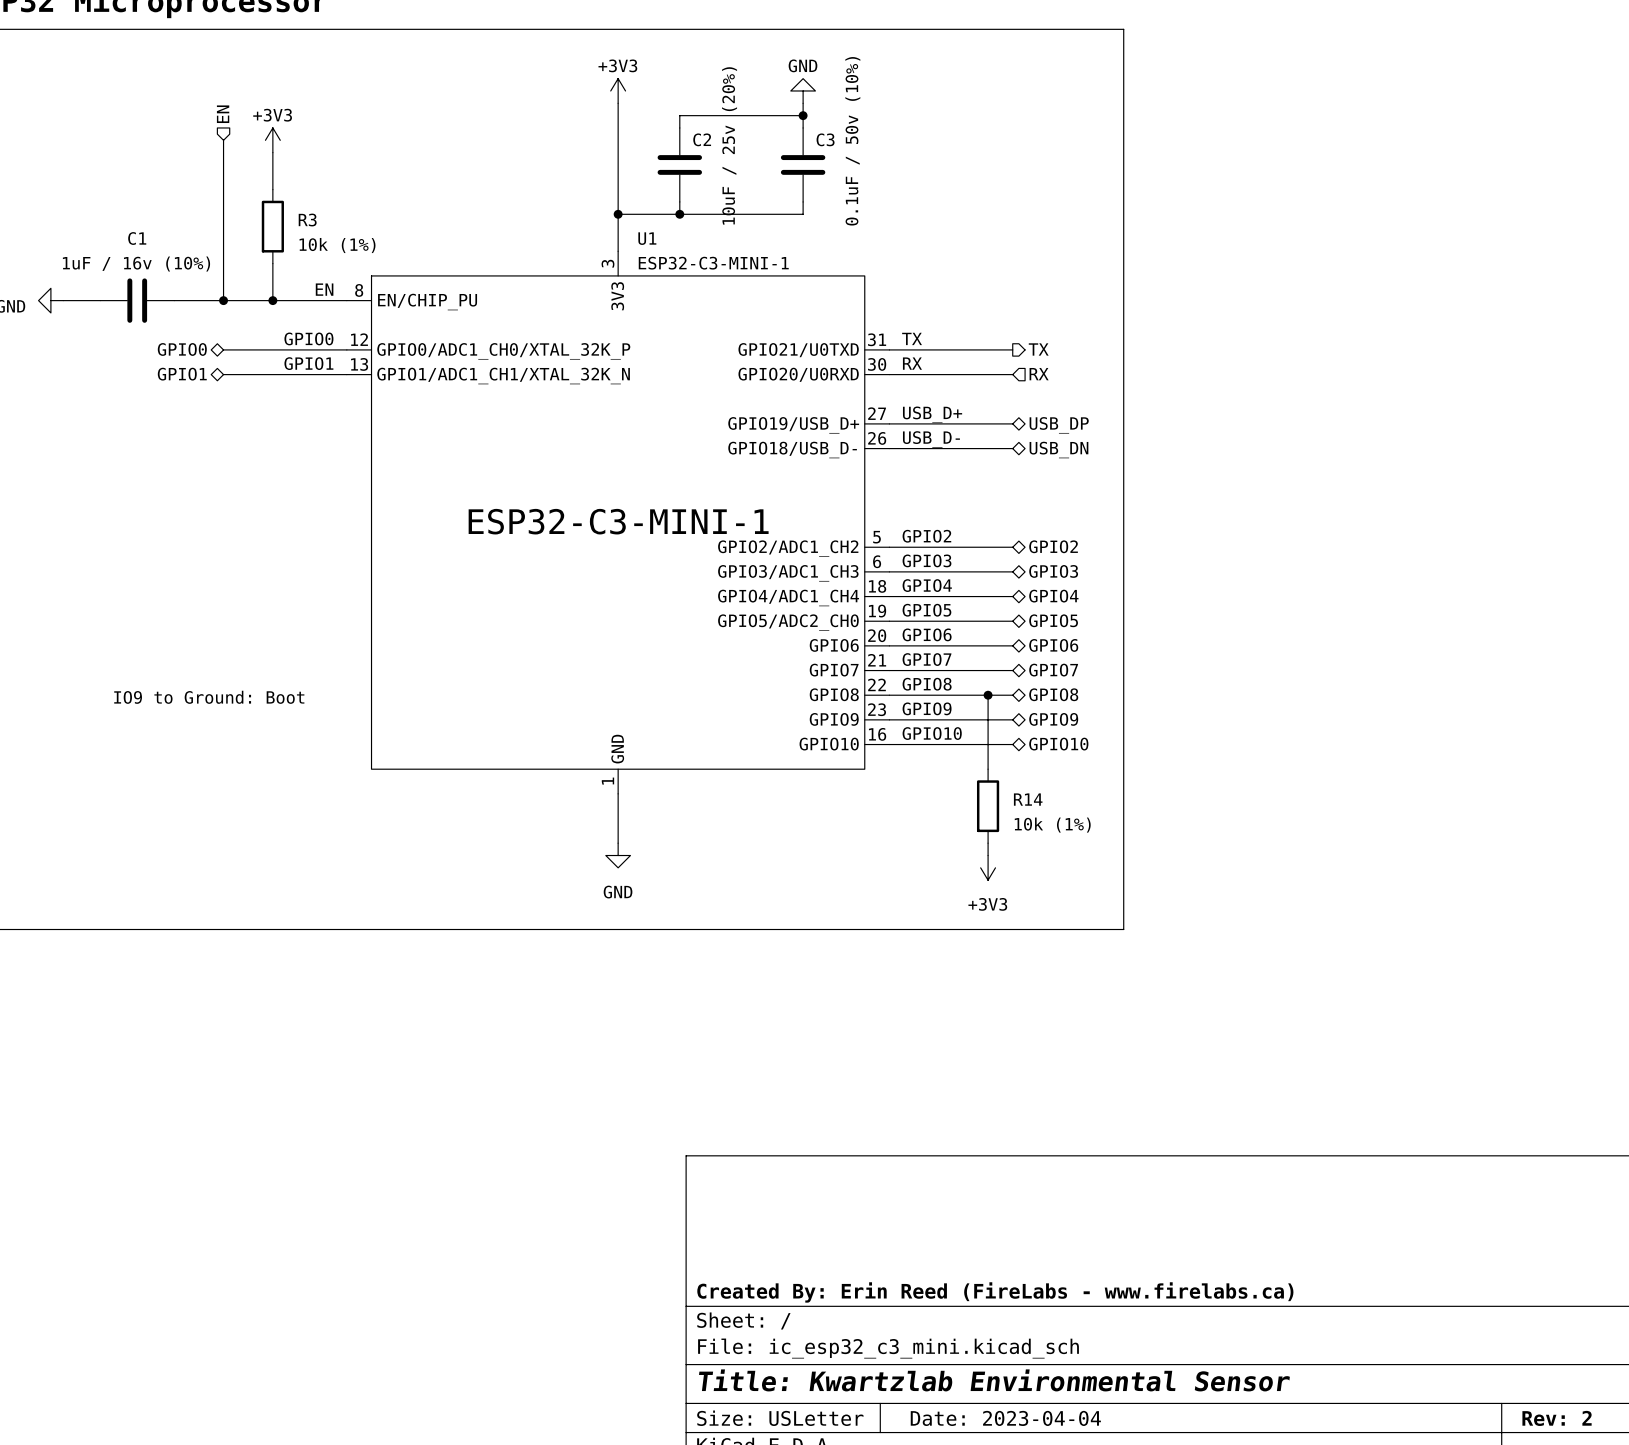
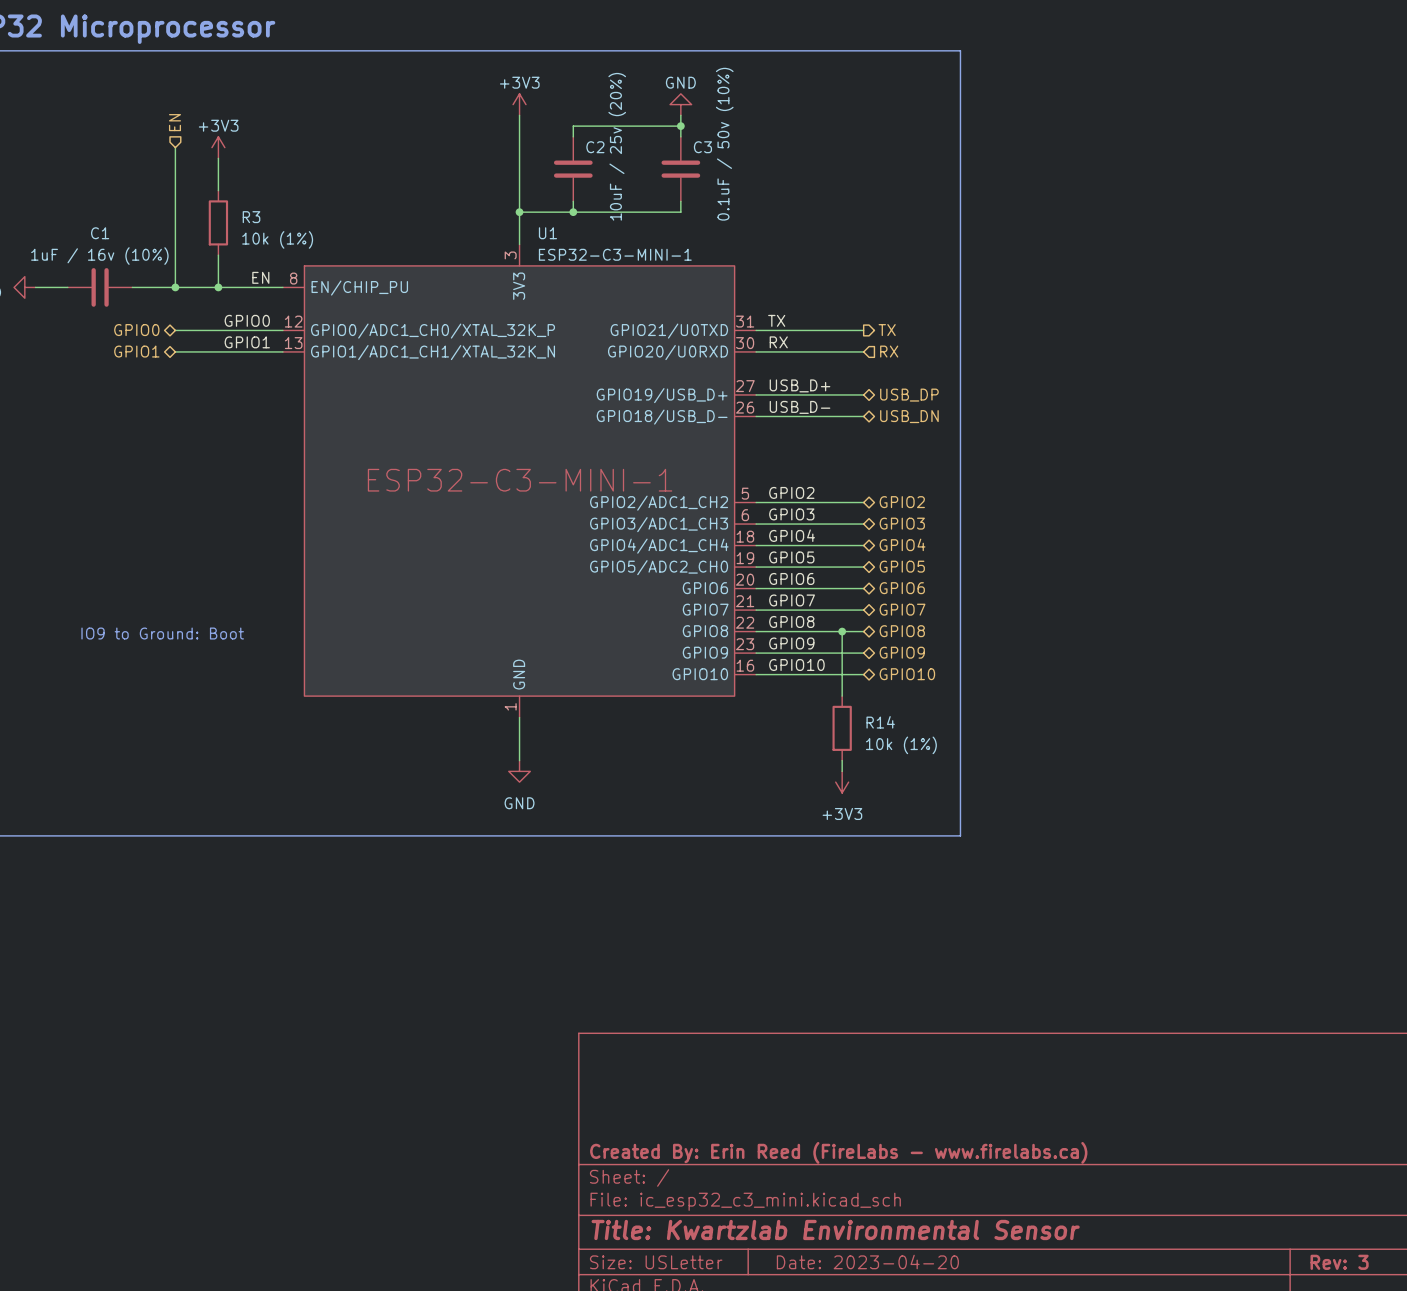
title block: Date: 2023-04-04 (1005, 1418) -> Date: 2023-04-20 (867, 1262)
title block: Rev: 2 (1557, 1418) -> Rev: 3 (1339, 1262)

